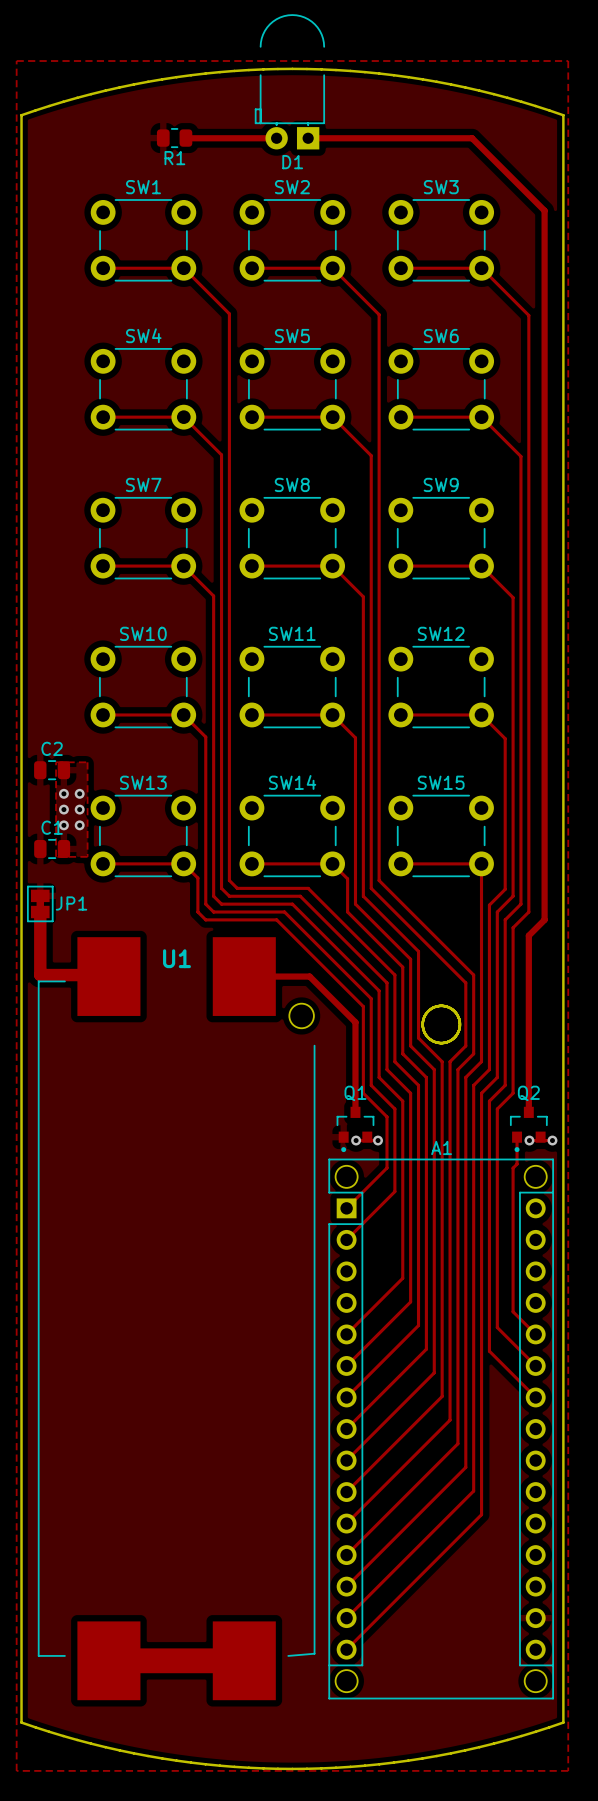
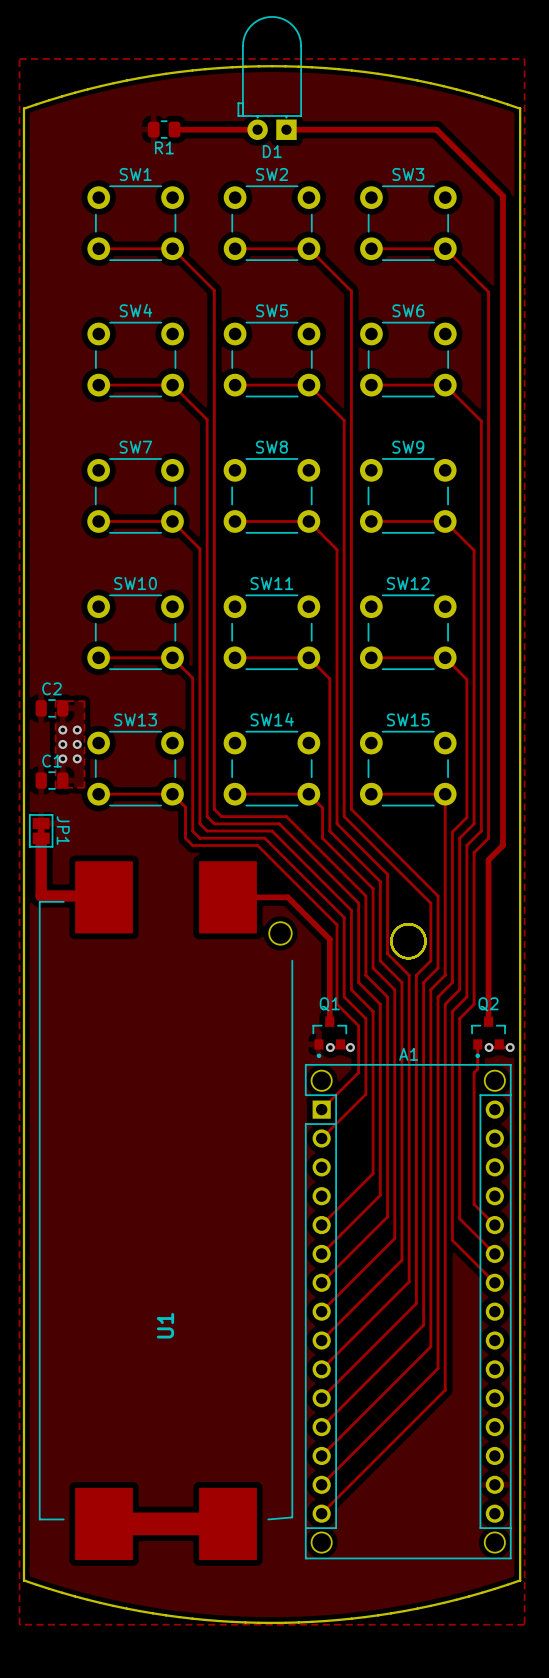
D1 footprint: [254, 14, 325, 150] -> [237, 16, 302, 140]
JP1 name rotation: 0° (71, 903) -> 90° clockwise (63, 830)
U1 name rotation: 0° (176, 958) -> 90° counterclockwise (165, 1325)
U1 name position: U1 (176, 958) -> U1 (165, 1325)

